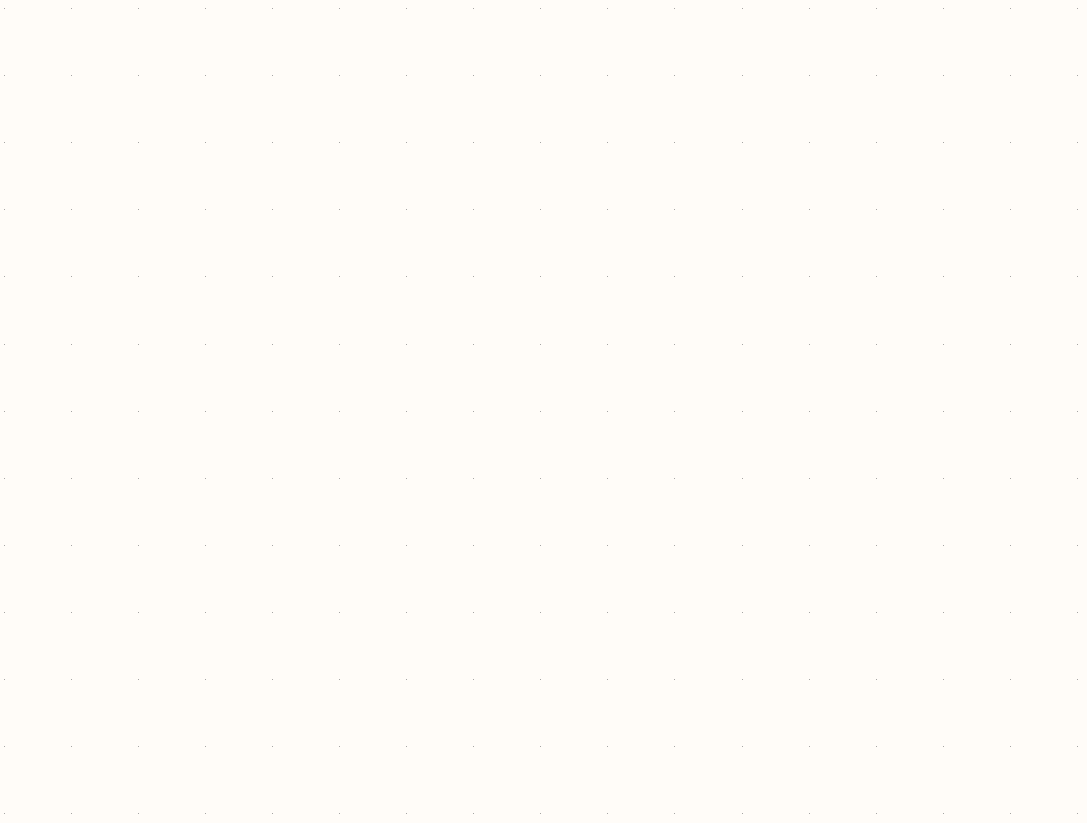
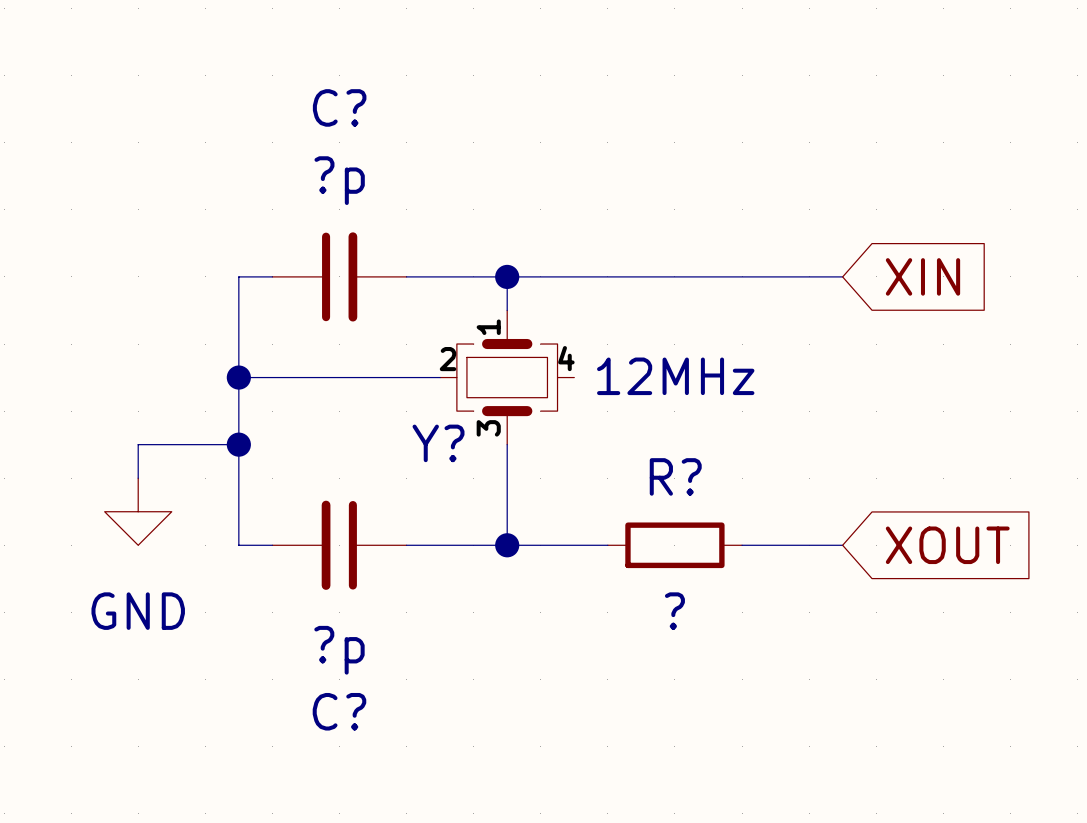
wire: none -> (272, 276) (238, 276) (238, 545) (272, 545)
C?: none -> ?p (339, 276)
wire: none -> (406, 276) (842, 276)
wire: none -> (507, 276) (507, 310)
junction: none -> (507, 276)
global label: none -> XIN (922, 276)
wire: none -> (238, 377) (440, 377)
junction: none -> (238, 377)
Y?: none -> 12MHz (507, 377)
wire: none -> (238, 444) (138, 444) (138, 478)
junction: none -> (238, 444)
wire: none -> (507, 444) (507, 545)
power symbol: none -> GND (138, 511)
C?: none -> ?p (339, 545)
wire: none -> (406, 545) (607, 545)
junction: none -> (507, 545)
R?: none -> ? (674, 545)
wire: none -> (742, 545) (842, 545)
global label: none -> XOUT (947, 545)

